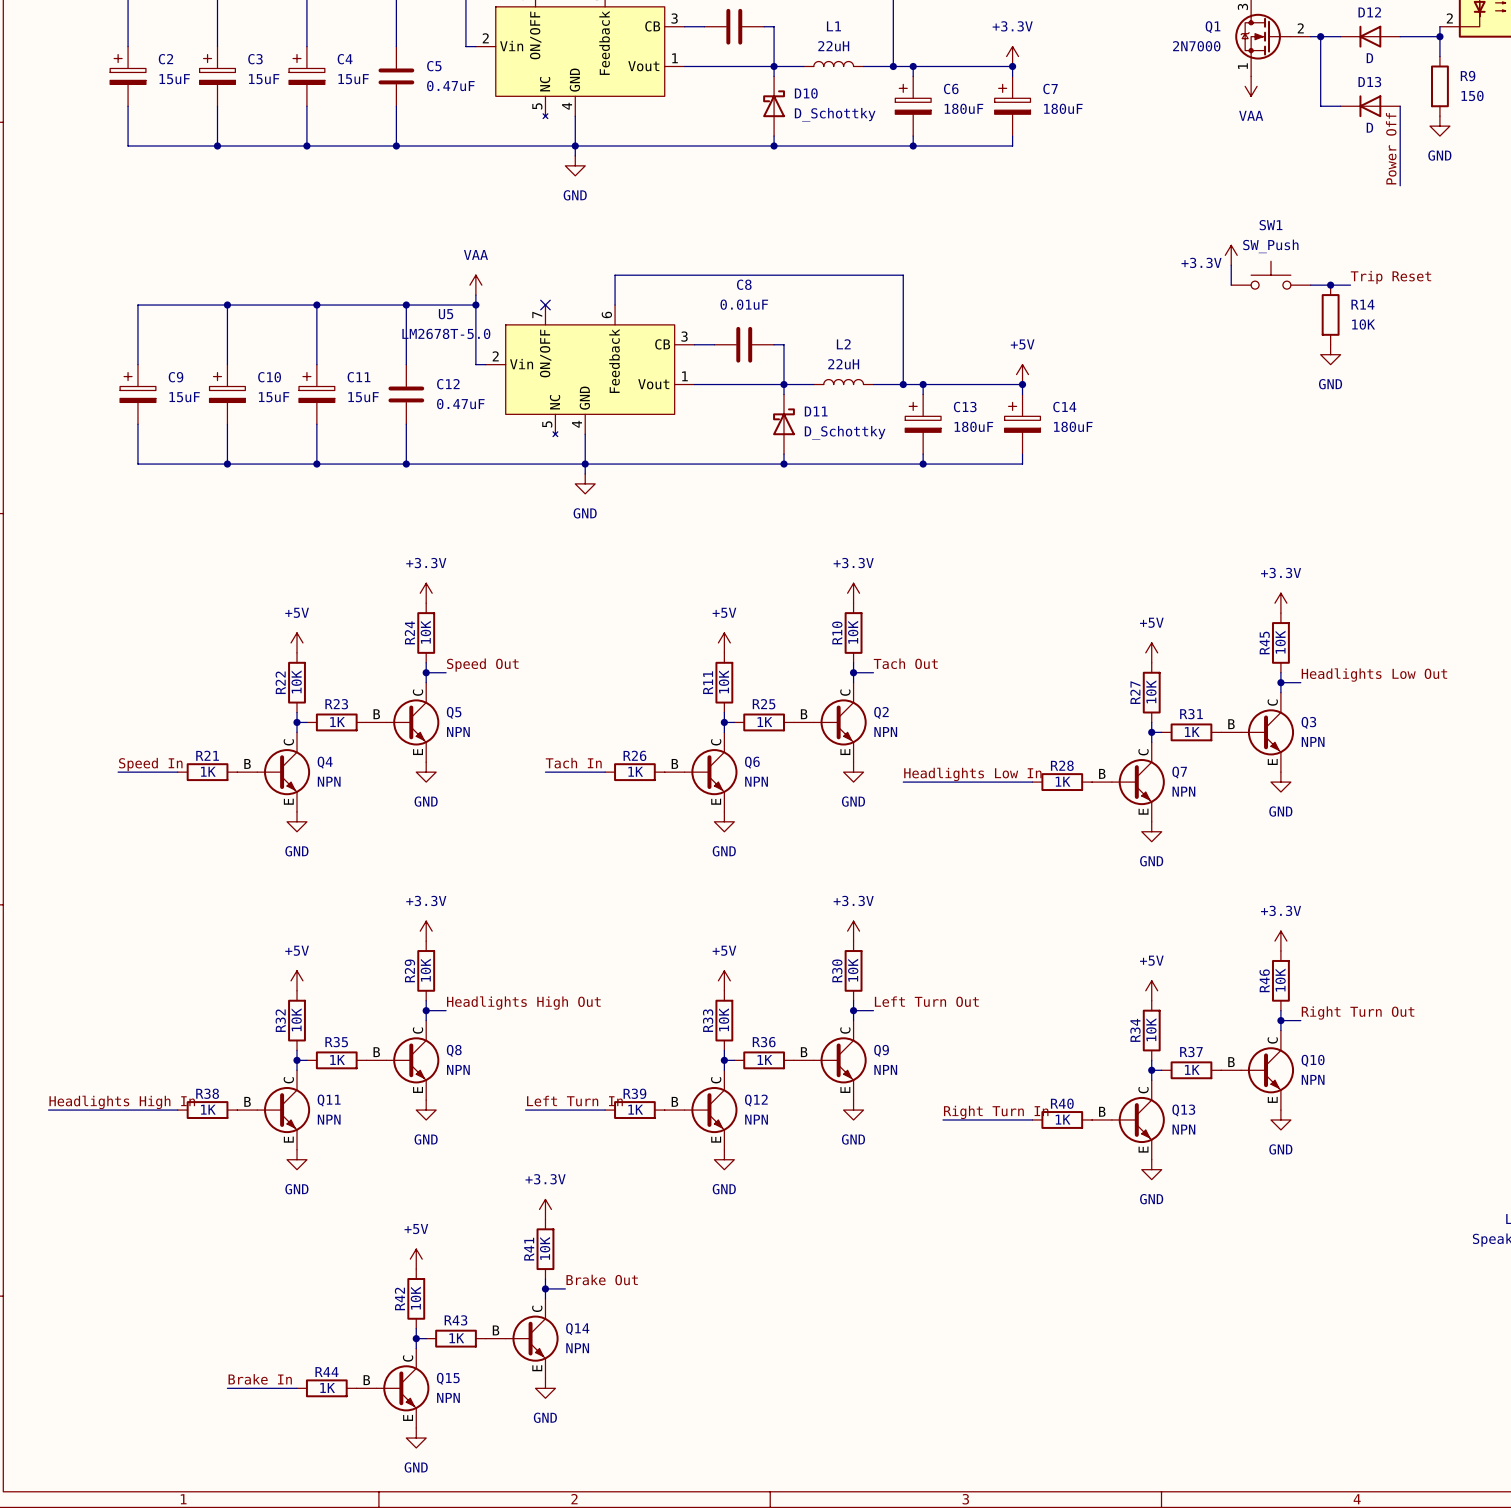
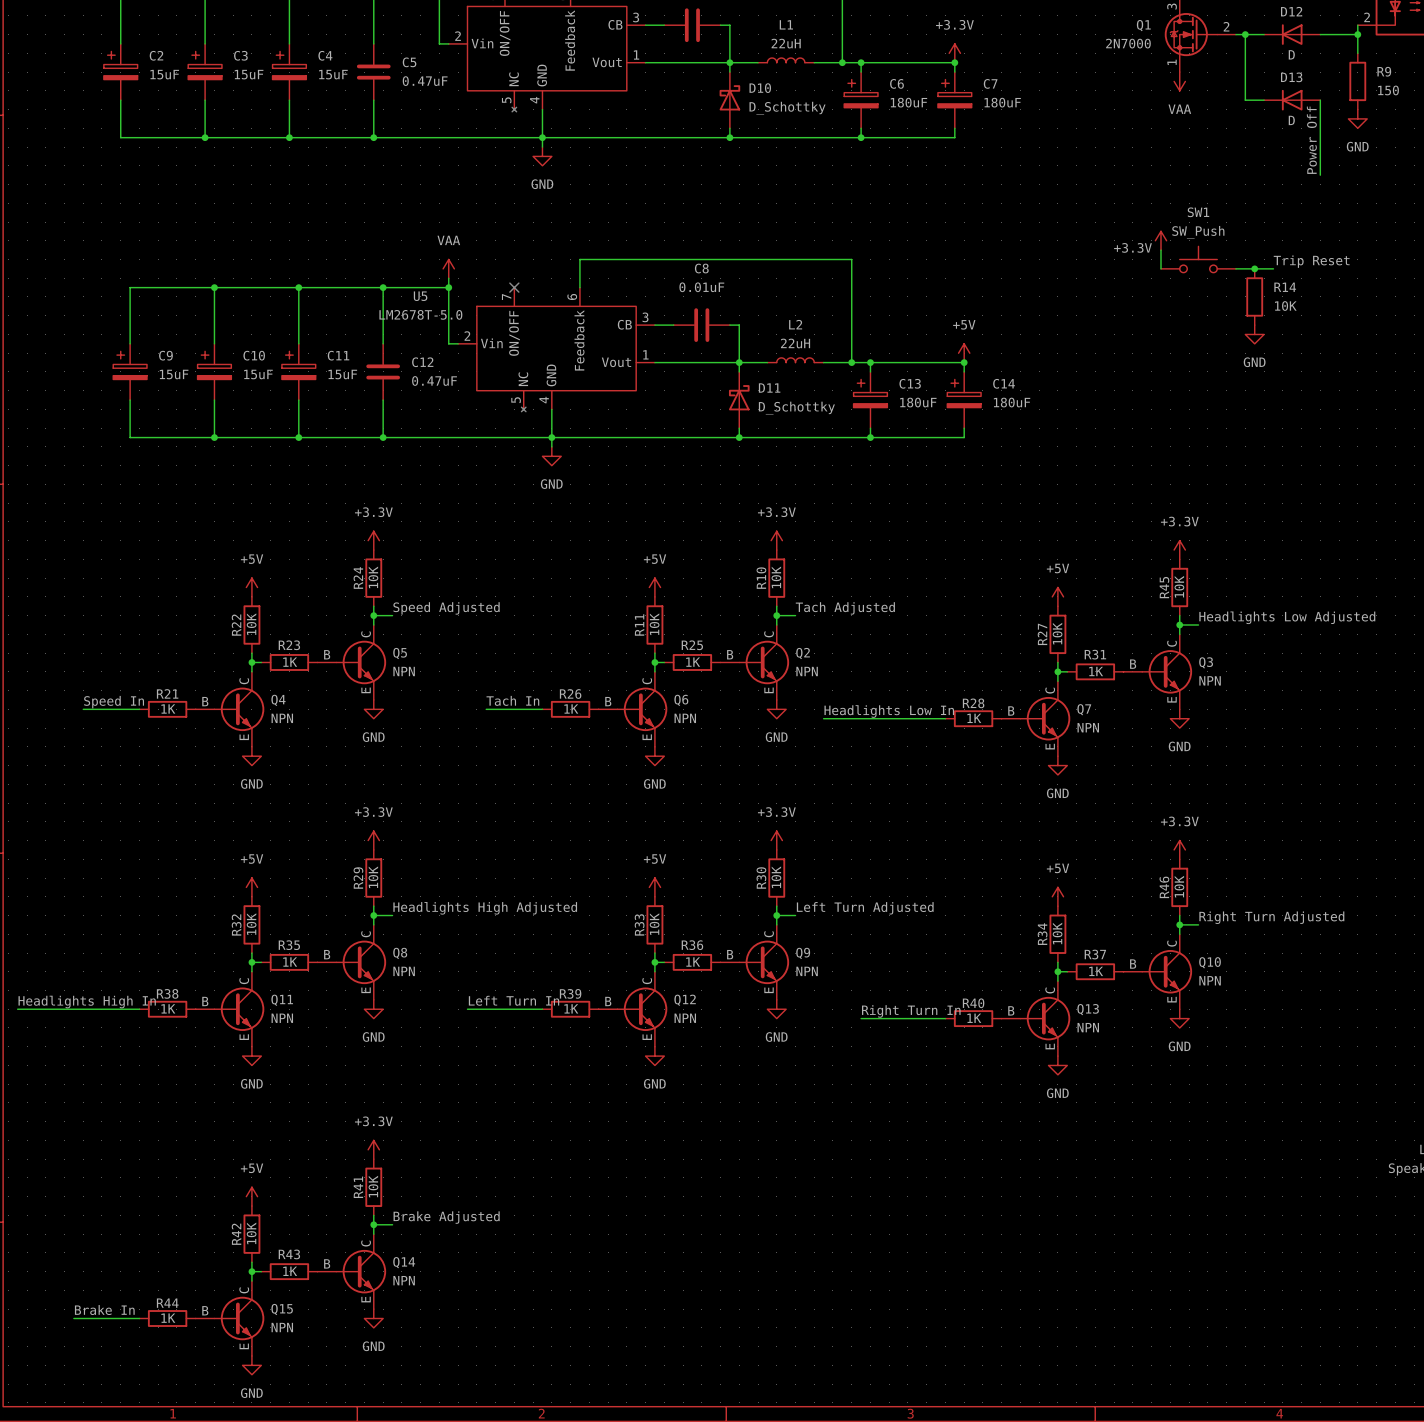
power symbol position: +3.3V (426, 593) -> +3.3V (373, 540)
power symbol position: +3.3V (853, 593) -> +3.3V (776, 540)
power symbol position: +3.3V (1280, 603) -> +3.3V (1179, 550)
R24 position: (426, 632) -> (373, 578)
R10 position: (853, 632) -> (776, 578)
power symbol position: +5V (297, 642) -> +5V (251, 587)
power symbol position: +5V (724, 642) -> +5V (654, 587)
R45 position: (1280, 642) -> (1179, 587)
power symbol position: +5V (1151, 652) -> +5V (1057, 596)
wire: (426, 662) (426, 682) -> (373, 606) (373, 624)
wire: (853, 662) (853, 682) -> (776, 606) (776, 624)
label: Tach Out (905, 663) -> Tach Adjusted (845, 608)
label: Speed Out (482, 665) -> Speed Adjusted (446, 608)
wire: (426, 672) (446, 672) -> (373, 615) (392, 615)
junction position: (426, 672) -> (373, 615)
wire: (853, 672) (873, 672) -> (776, 615) (795, 615)
junction position: (853, 672) -> (776, 615)
wire: (1280, 672) (1280, 692) -> (1179, 615) (1179, 634)
label: Headlights Low Out (1374, 675) -> Headlights Low Adjusted (1287, 617)
R22 position: (297, 682) -> (251, 624)
R11 position: (724, 682) -> (654, 624)
wire: (1280, 682) (1300, 682) -> (1179, 624) (1198, 624)
junction position: (1280, 682) -> (1179, 624)
R27 position: (1151, 692) -> (1057, 634)
wire: (297, 712) (297, 732) -> (251, 653) (251, 671)
wire: (724, 712) (724, 732) -> (654, 653) (654, 671)
wire: (297, 722) (306, 722) -> (251, 662) (261, 662)
junction position: (297, 722) -> (251, 662)
R23 position: (336, 722) -> (289, 662)
Q5 position: (402, 722) -> (351, 662)
wire: (724, 722) (734, 722) -> (654, 662) (664, 662)
junction position: (724, 722) -> (654, 662)
R25 position: (764, 722) -> (692, 662)
Q2 position: (830, 722) -> (754, 662)
wire: (1151, 722) (1151, 742) -> (1057, 662) (1057, 681)
wire: (1151, 732) (1161, 732) -> (1057, 671) (1067, 671)
junction position: (1151, 732) -> (1057, 671)
R31 position: (1191, 732) -> (1095, 671)
Q3 position: (1257, 732) -> (1157, 671)
label position: Tach In (573, 763) -> Tach In (512, 700)
label position: Speed In (150, 764) -> Speed In (114, 702)
wire: (118, 772) (177, 772) -> (83, 709) (139, 709)
R21 position: (207, 772) -> (167, 709)
Q4 position: (273, 772) -> (230, 709)
power symbol position: GND (426, 772) -> GND (373, 709)
wire: (545, 772) (605, 772) -> (486, 709) (542, 709)
R26 position: (634, 772) -> (570, 709)
Q6 position: (701, 772) -> (632, 709)
power symbol position: GND (853, 772) -> GND (776, 709)
label position: Headlights Low In (972, 774) -> Headlights Low In (889, 711)
wire: (903, 782) (1032, 782) -> (823, 718) (945, 718)
R28 position: (1062, 782) -> (973, 718)
Q7 position: (1128, 782) -> (1035, 718)
power symbol position: GND (1280, 782) -> GND (1179, 718)
power symbol position: GND (297, 821) -> GND (251, 756)
power symbol position: GND (724, 821) -> GND (654, 756)
power symbol position: GND (1151, 831) -> GND (1057, 765)
power symbol position: +3.3V (426, 931) -> +3.3V (373, 840)
power symbol position: +3.3V (853, 931) -> +3.3V (776, 840)
power symbol position: +3.3V (1280, 941) -> +3.3V (1179, 849)
label: none -> Headlights High Adjusted (485, 908)
label: none -> Left Turn Adjusted (865, 908)
junction: none -> (373, 915)
R29 position: (426, 970) -> (373, 878)
junction: none -> (776, 915)
R30 position: (853, 970) -> (776, 878)
label: none -> Right Turn Adjusted (1271, 917)
power symbol position: +5V (297, 980) -> +5V (251, 887)
power symbol position: +5V (724, 980) -> +5V (654, 887)
junction: none -> (1179, 924)
R46 position: (1280, 980) -> (1179, 887)
power symbol position: +5V (1151, 990) -> +5V (1057, 896)
wire: (426, 1000) (426, 1020) -> (373, 906) (373, 924)
wire: (853, 1000) (853, 1020) -> (776, 906) (776, 924)
label: Left Turn Out (926, 1001) -> none
label: Headlights High Out (523, 1003) -> none
wire: (426, 1010) (446, 1010) -> (373, 915) (392, 915)
junction: (426, 1010) -> none
wire: (853, 1010) (873, 1010) -> (776, 915) (795, 915)
junction: (853, 1010) -> none
wire: (1280, 1010) (1280, 1030) -> (1179, 915) (1179, 934)
label: Right Turn Out (1358, 1012) -> none
junction: none -> (251, 962)
R32 position: (297, 1020) -> (251, 924)
junction: none -> (654, 962)
R33 position: (724, 1020) -> (654, 924)
wire: (1280, 1020) (1300, 1020) -> (1179, 924) (1198, 924)
junction: (1280, 1020) -> none
junction: none -> (1057, 971)
R34 position: (1151, 1030) -> (1057, 934)
wire: (297, 1050) (297, 1070) -> (251, 953) (251, 971)
wire: (724, 1050) (724, 1070) -> (654, 953) (654, 971)
wire: (297, 1060) (306, 1060) -> (251, 962) (261, 962)
junction: (297, 1060) -> none
R35 position: (336, 1060) -> (289, 962)
Q8 position: (402, 1060) -> (351, 962)
wire: (724, 1060) (734, 1060) -> (654, 962) (664, 962)
junction: (724, 1060) -> none
R36 position: (764, 1060) -> (692, 962)
Q9 position: (830, 1060) -> (754, 962)
wire: (1151, 1060) (1151, 1080) -> (1057, 962) (1057, 981)
wire: (1151, 1070) (1161, 1070) -> (1057, 971) (1067, 971)
junction: (1151, 1070) -> none
R37 position: (1191, 1070) -> (1095, 971)
Q10 position: (1257, 1070) -> (1157, 971)
label position: Left Turn In (574, 1101) -> Left Turn In (514, 1000)
label position: Headlights High In (122, 1102) -> Headlights High In (87, 1002)
wire: (48, 1110) (177, 1110) -> (17, 1009) (139, 1009)
R38 position: (207, 1110) -> (167, 1009)
Q11 position: (273, 1110) -> (230, 1009)
power symbol position: GND (426, 1110) -> GND (373, 1009)
wire: (525, 1110) (605, 1110) -> (467, 1009) (542, 1009)
R39 position: (634, 1110) -> (570, 1009)
Q12 position: (701, 1110) -> (632, 1009)
power symbol position: GND (853, 1110) -> GND (776, 1009)
label position: Right Turn In (996, 1112) -> Right Turn In (911, 1011)
wire: (943, 1119) (1032, 1119) -> (861, 1018) (945, 1018)
R40 position: (1062, 1119) -> (973, 1018)
Q13 position: (1128, 1119) -> (1035, 1018)
power symbol position: GND (1280, 1119) -> GND (1179, 1018)
power symbol position: GND (297, 1159) -> GND (251, 1056)
power symbol position: GND (724, 1159) -> GND (654, 1056)
power symbol position: GND (1151, 1169) -> GND (1057, 1065)
power symbol: +3.3V (545, 1209) -> none
power symbol: none -> +3.3V (373, 1149)
R41 position: (545, 1249) -> (373, 1187)
power symbol: +5V (416, 1259) -> none
power symbol: none -> +5V (251, 1196)
wire: (545, 1279) (545, 1298) -> (373, 1215) (373, 1234)
label: Brake Out (602, 1279) -> none
wire: (545, 1288) (565, 1288) -> (373, 1224) (392, 1224)
junction: (545, 1288) -> none
label: none -> Brake Adjusted (446, 1217)
R42 position: (416, 1298) -> (251, 1234)
wire: (416, 1328) (416, 1348) -> (251, 1262) (251, 1281)
wire: (416, 1338) (426, 1338) -> (251, 1271) (261, 1271)
junction position: (416, 1338) -> (373, 1224)
R43 position: (456, 1338) -> (289, 1271)
Q14 position: (522, 1338) -> (351, 1271)
junction: none -> (251, 1271)
label position: Brake In (260, 1379) -> Brake In (104, 1310)
wire: (227, 1388) (297, 1388) -> (73, 1318) (139, 1318)
R44 position: (326, 1388) -> (167, 1318)
Q15 position: (393, 1388) -> (230, 1318)
power symbol: GND (545, 1388) -> none
power symbol position: GND (416, 1438) -> GND (373, 1318)
power symbol: none -> GND (251, 1365)

